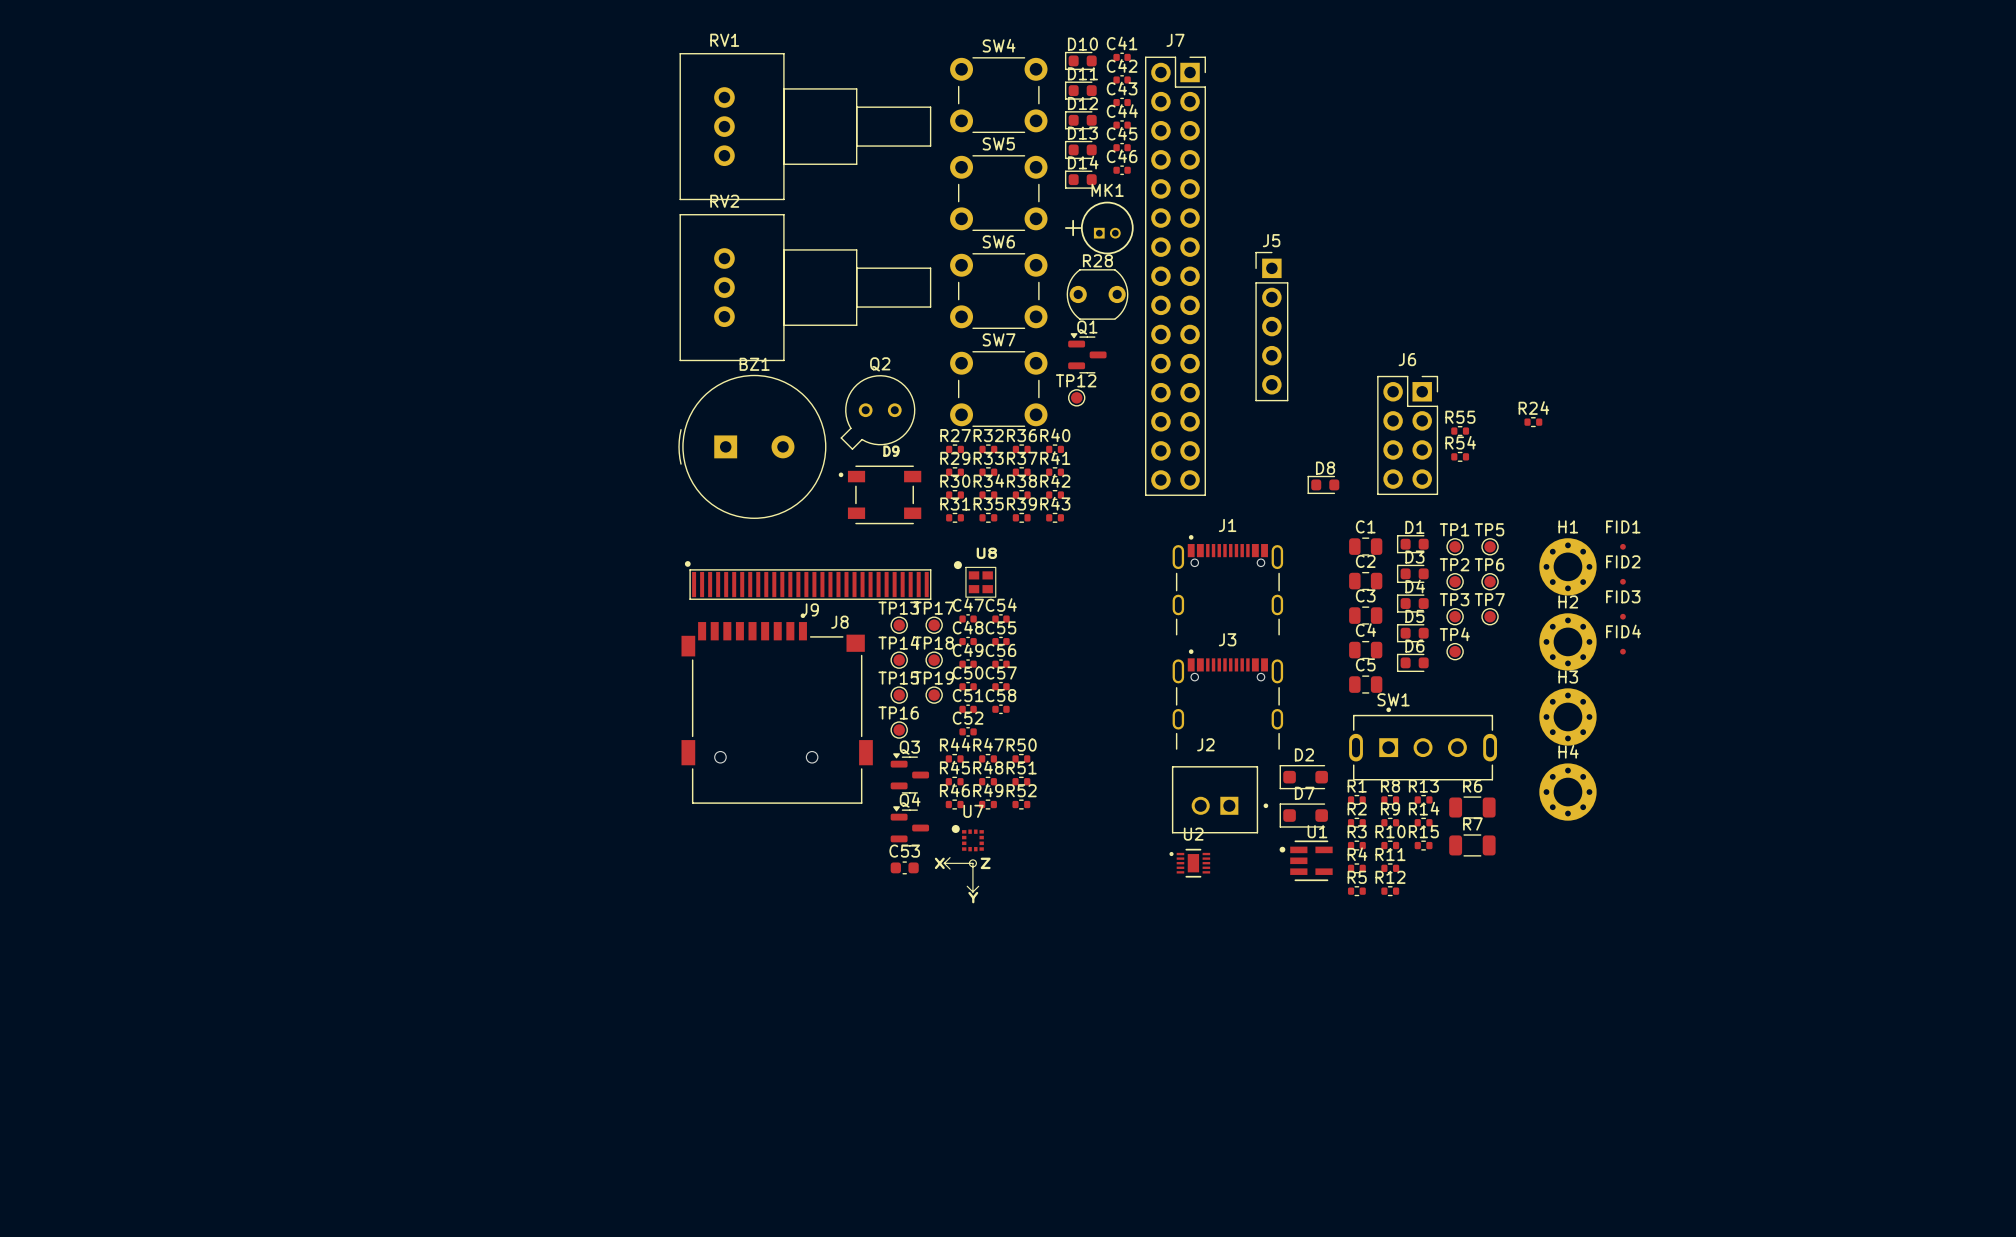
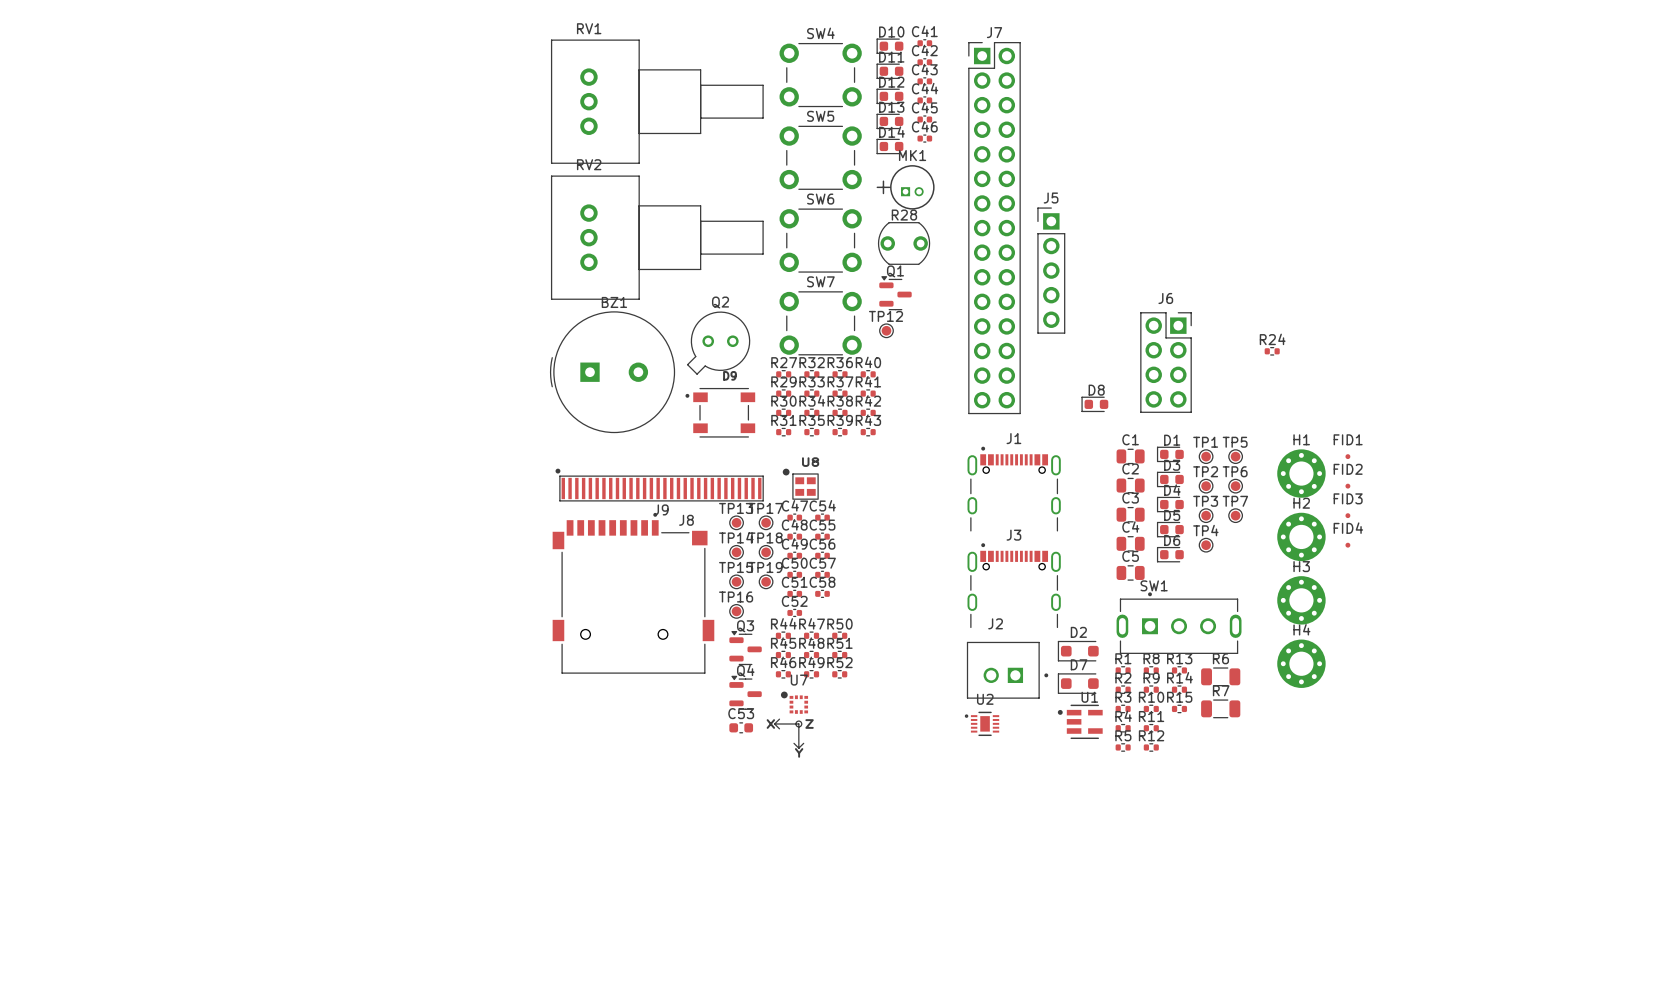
J7 footprint: [1145, 56, 1206, 496] -> [968, 42, 1021, 415]
R55: (1460, 431) -> none
R54: (1460, 456) -> none

